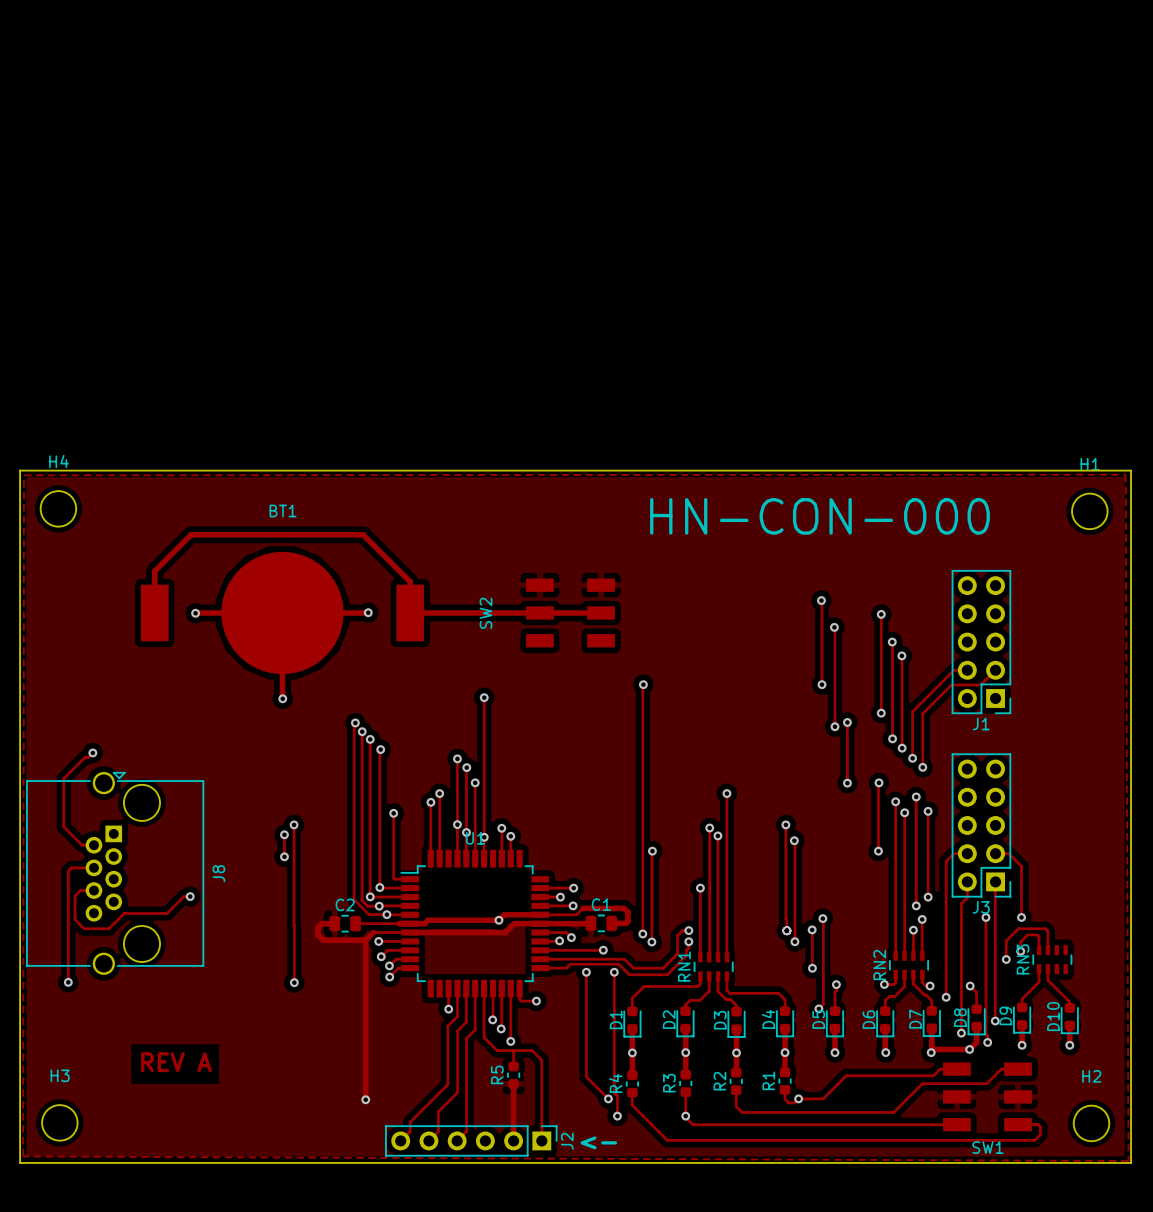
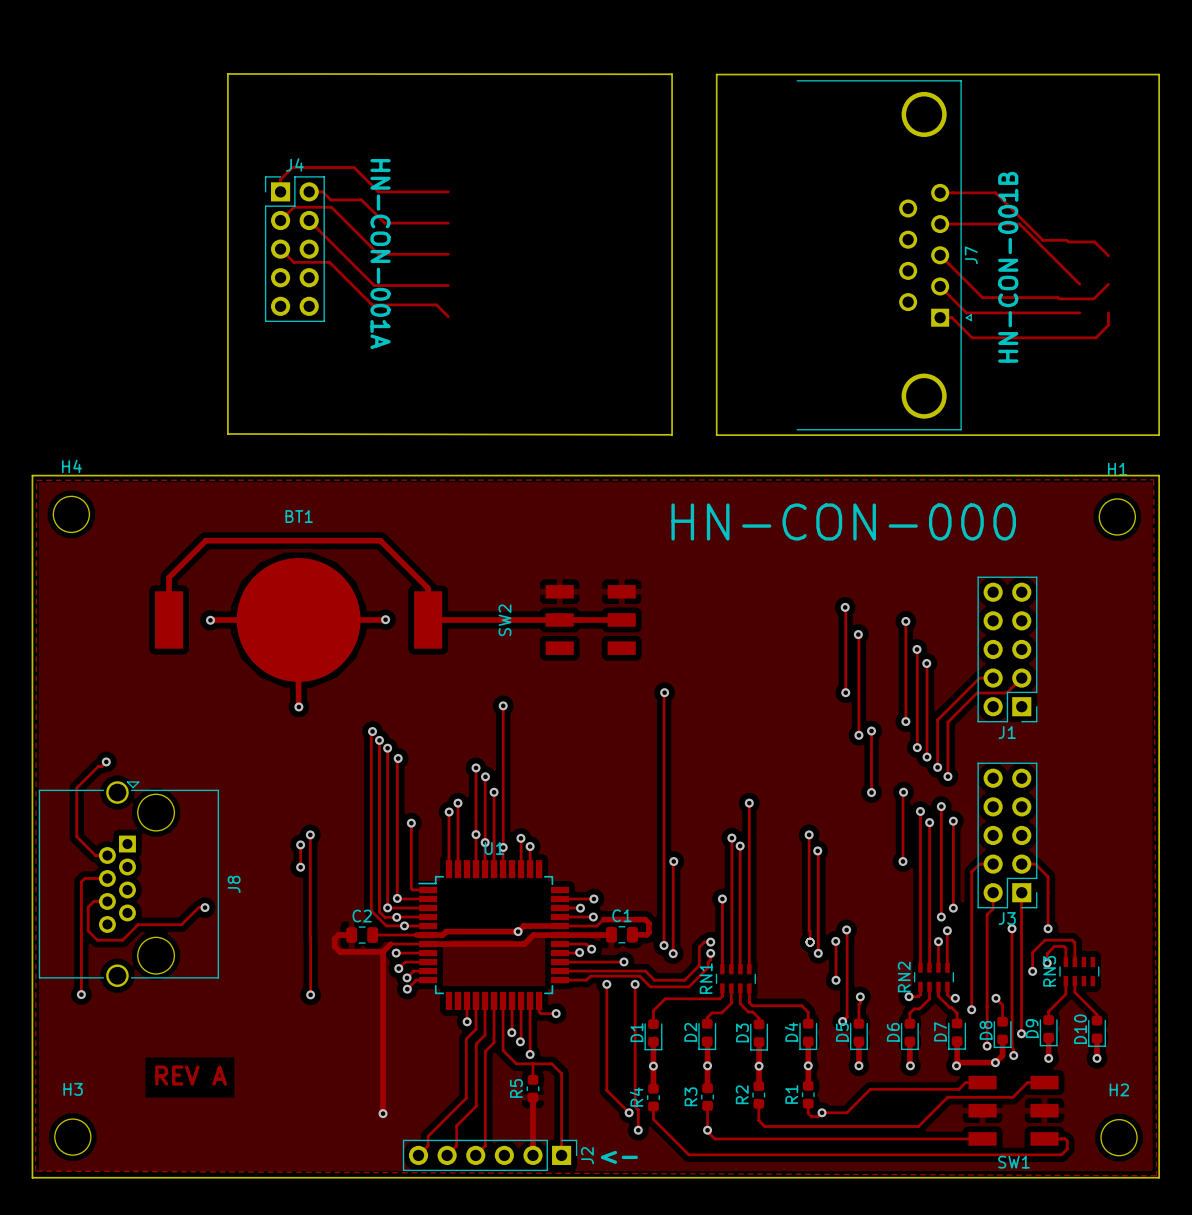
board edge: none -> (227, 73) (672, 74) (672, 434) (227, 433) (227, 73)
board edge: none -> (716, 74) (1159, 74) (1159, 435) (716, 435) (716, 74)
track: none -> (280, 191) (280, 179) (292, 167) (354, 167) (378, 191) (448, 191)
track: none -> (309, 191) (322, 191) (330, 199) (361, 199) (384, 223) (448, 223)
track: none -> (940, 192) (995, 192) (1043, 240) (1094, 241) (1108, 255)
track: none -> (280, 220) (293, 207) (331, 207) (378, 254) (448, 254)
track: none -> (309, 220) (374, 285) (448, 285)
track: none -> (940, 224) (1019, 224) (1079, 284)
track: none -> (280, 249) (293, 262) (329, 262) (372, 304) (436, 304) (448, 316)
J4: none -> (294, 249)
text: none -> HN-CON-001A (380, 254)
J7: none -> (884, 255)
track: none -> (940, 255) (982, 297) (1093, 298) (1108, 284)
text: none -> HN-CON-001B (1008, 267)
track: none -> (940, 286) (966, 312) (1079, 312)
track: none -> (1108, 312) (1108, 325) (1095, 337) (972, 337) (951, 317) (940, 317)

